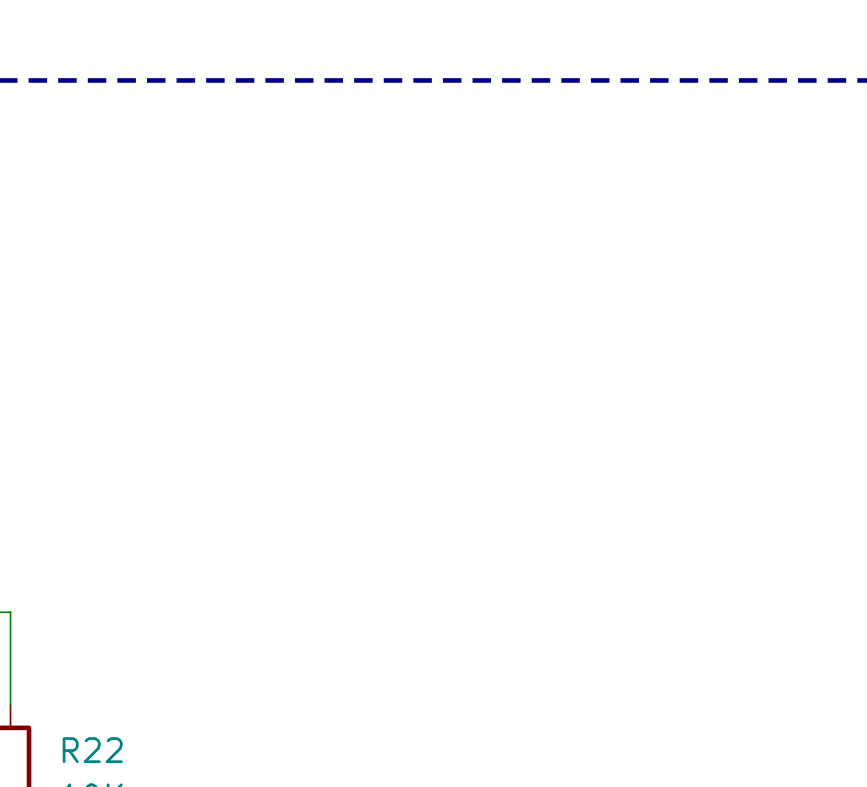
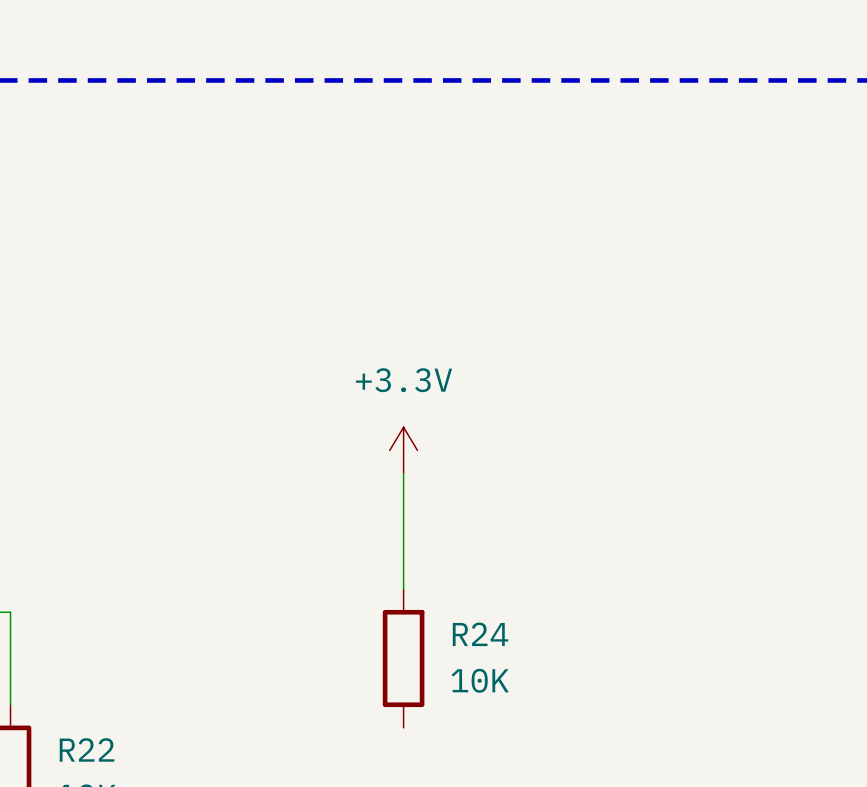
power symbol: none -> +3.3V (403, 450)
wire: none -> (403, 473) (403, 589)
R24: none -> 10K (403, 658)

